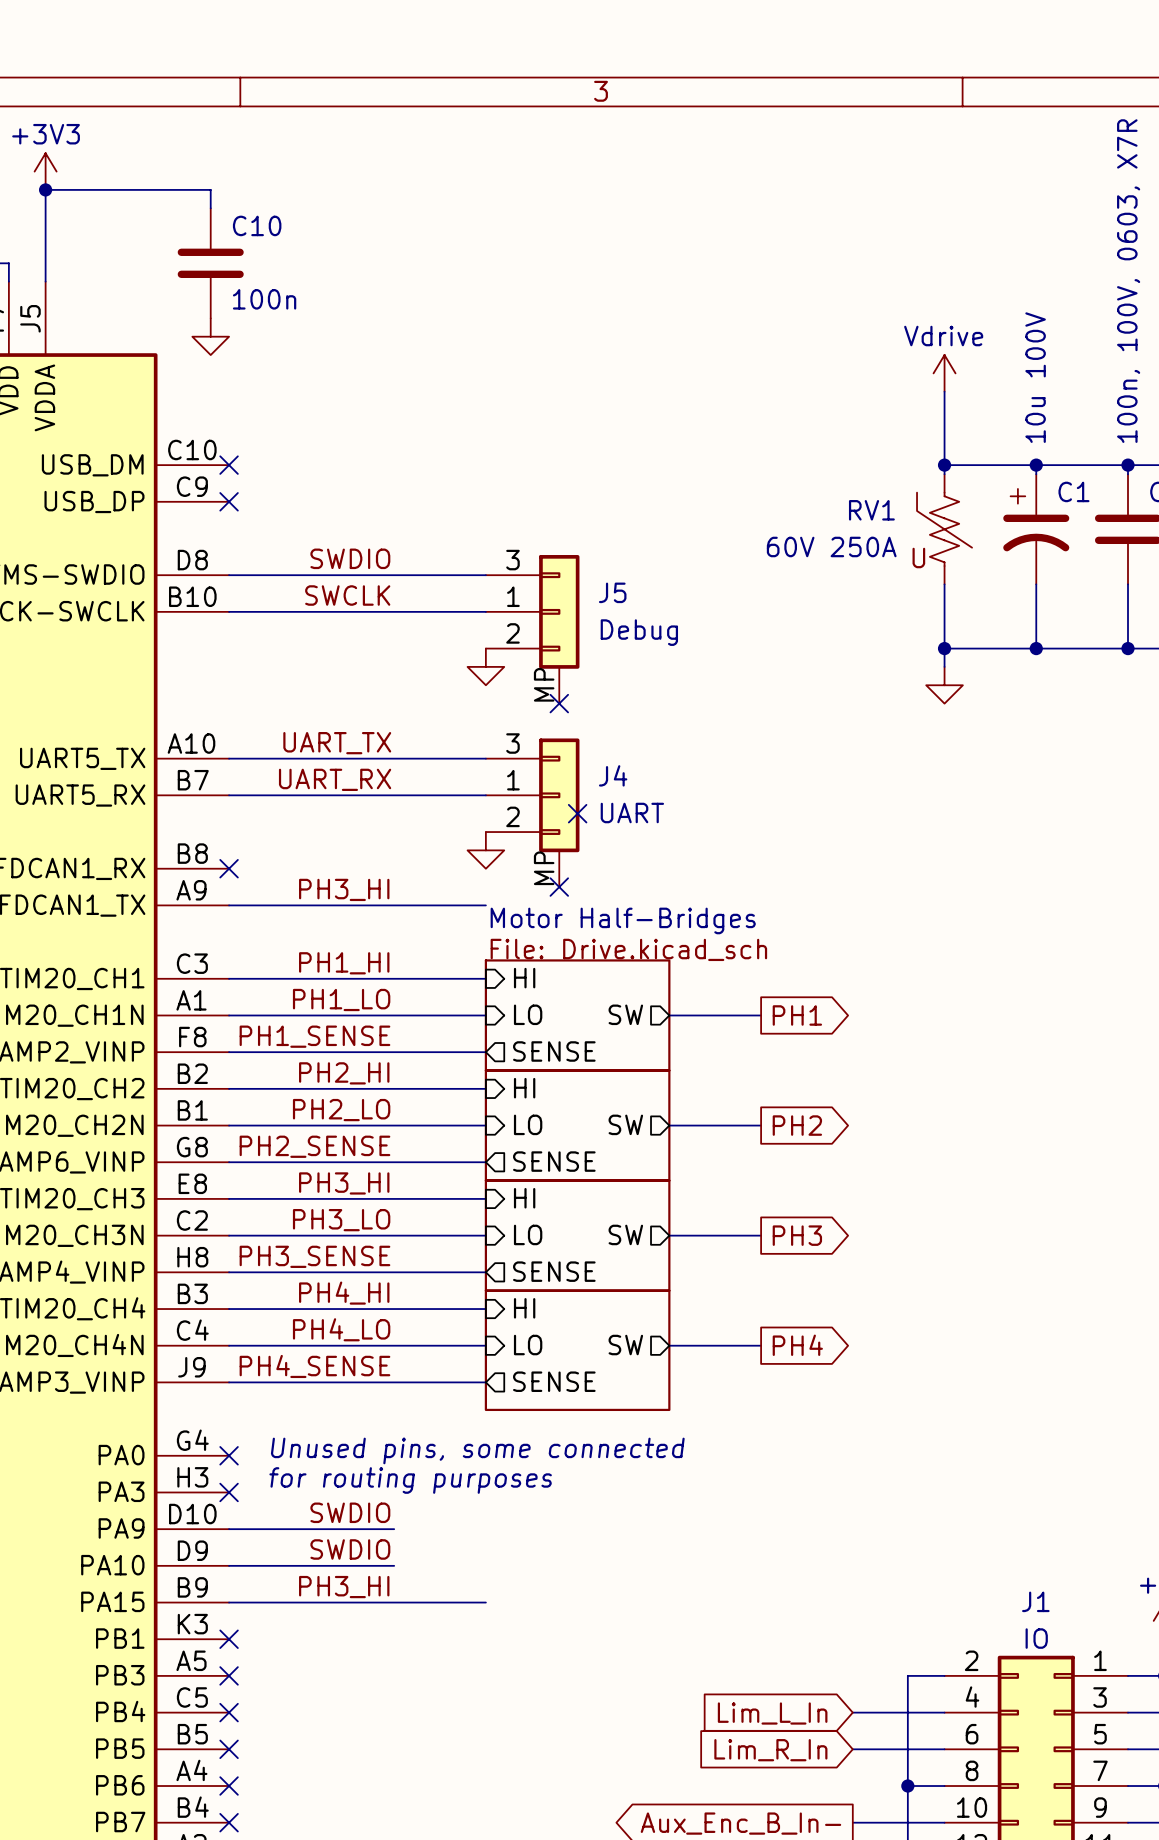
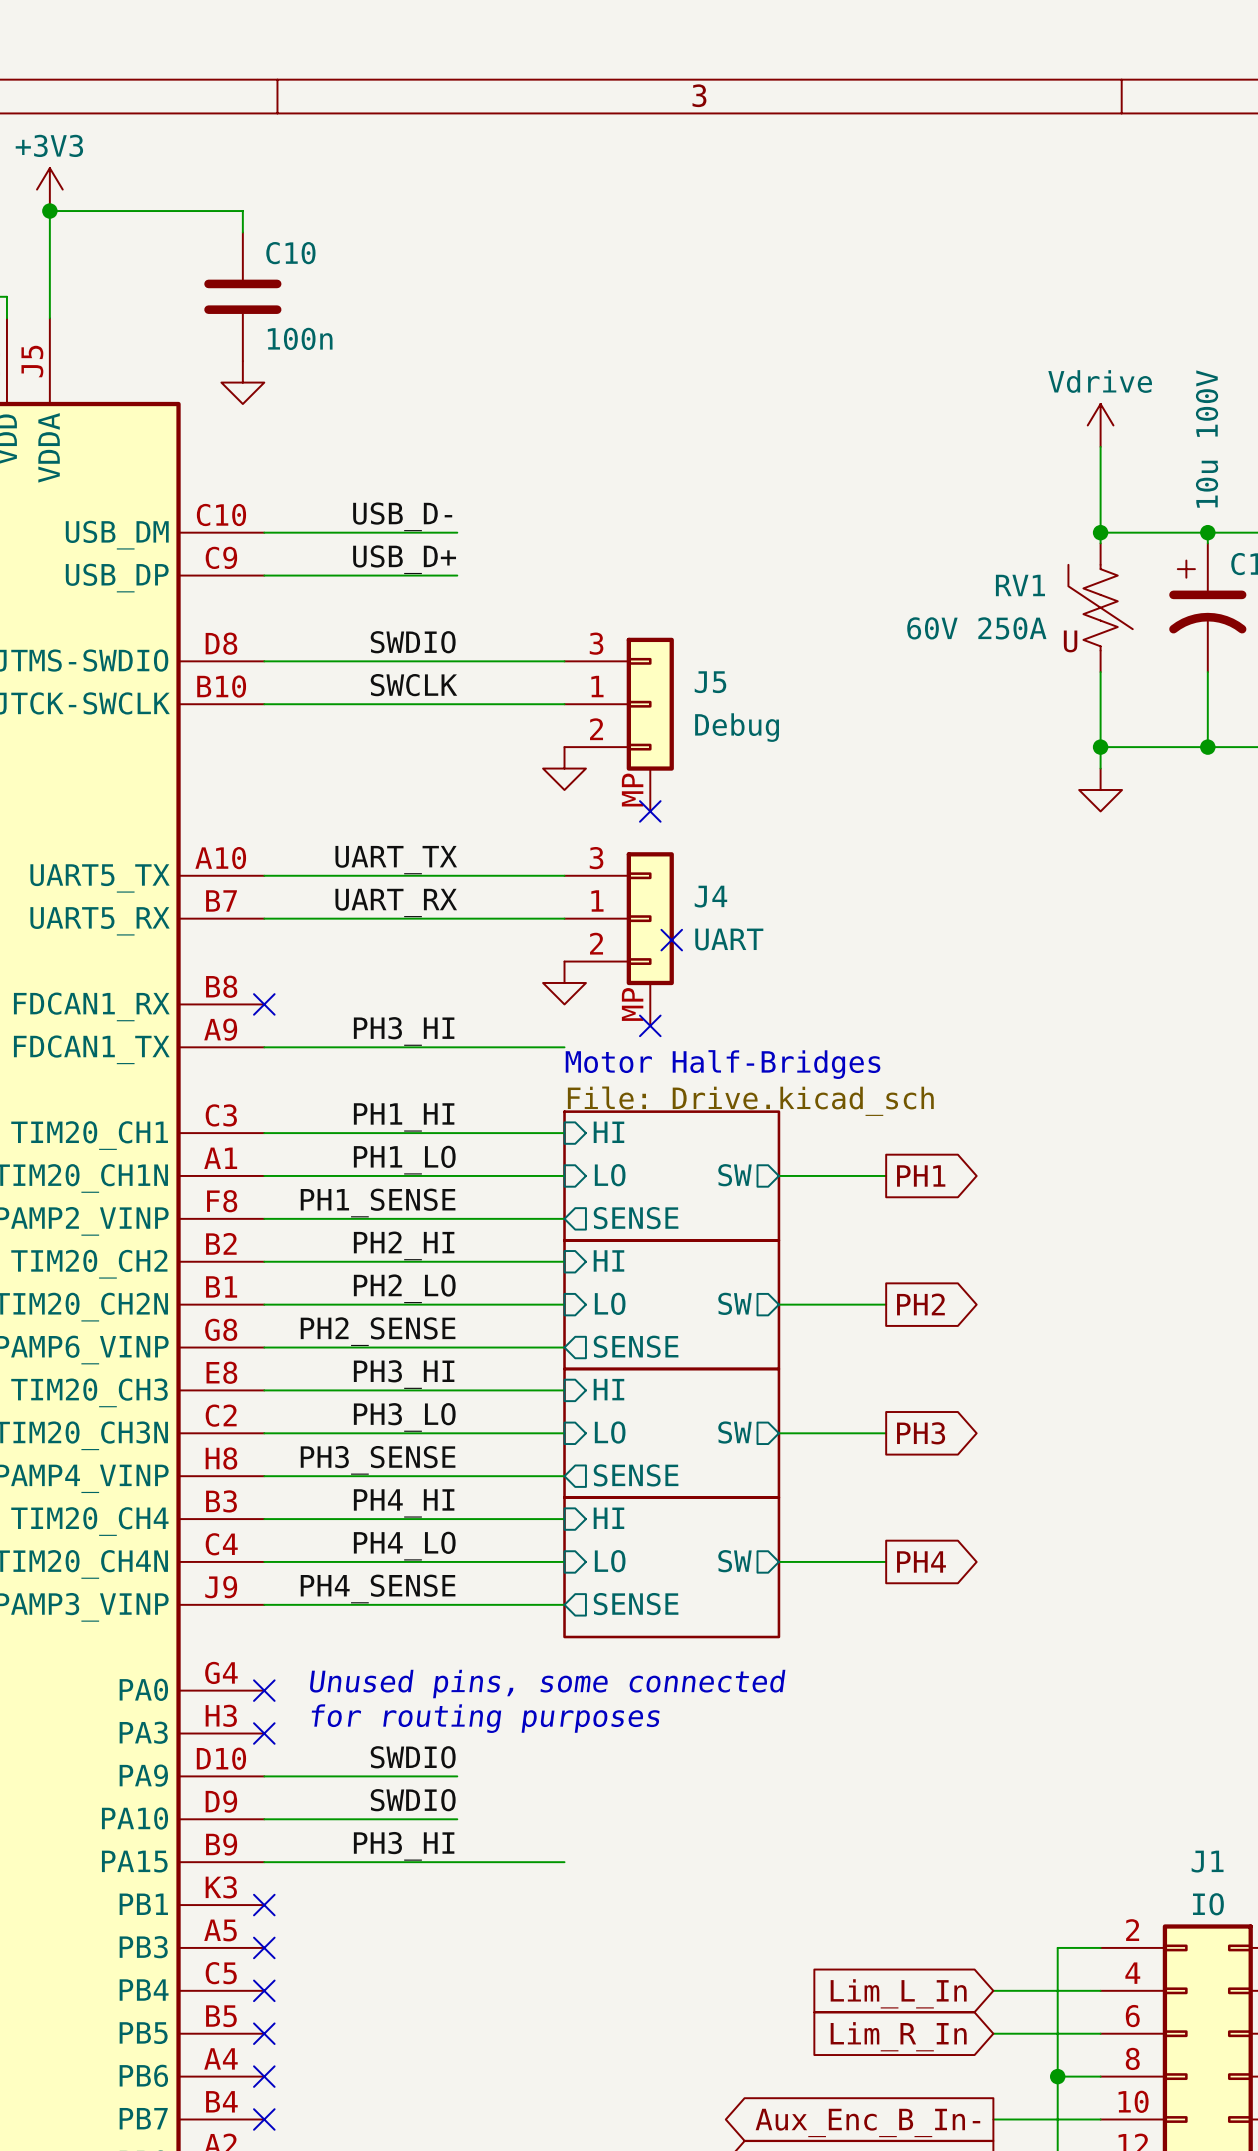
label: none -> USB_D- (402, 516)
wire: none -> (264, 532) (457, 532)
no-connect mark: (229, 465) -> none
label: none -> USB_D+ (404, 559)
wire: none -> (264, 575) (457, 575)
no-connect mark: (229, 501) -> none

